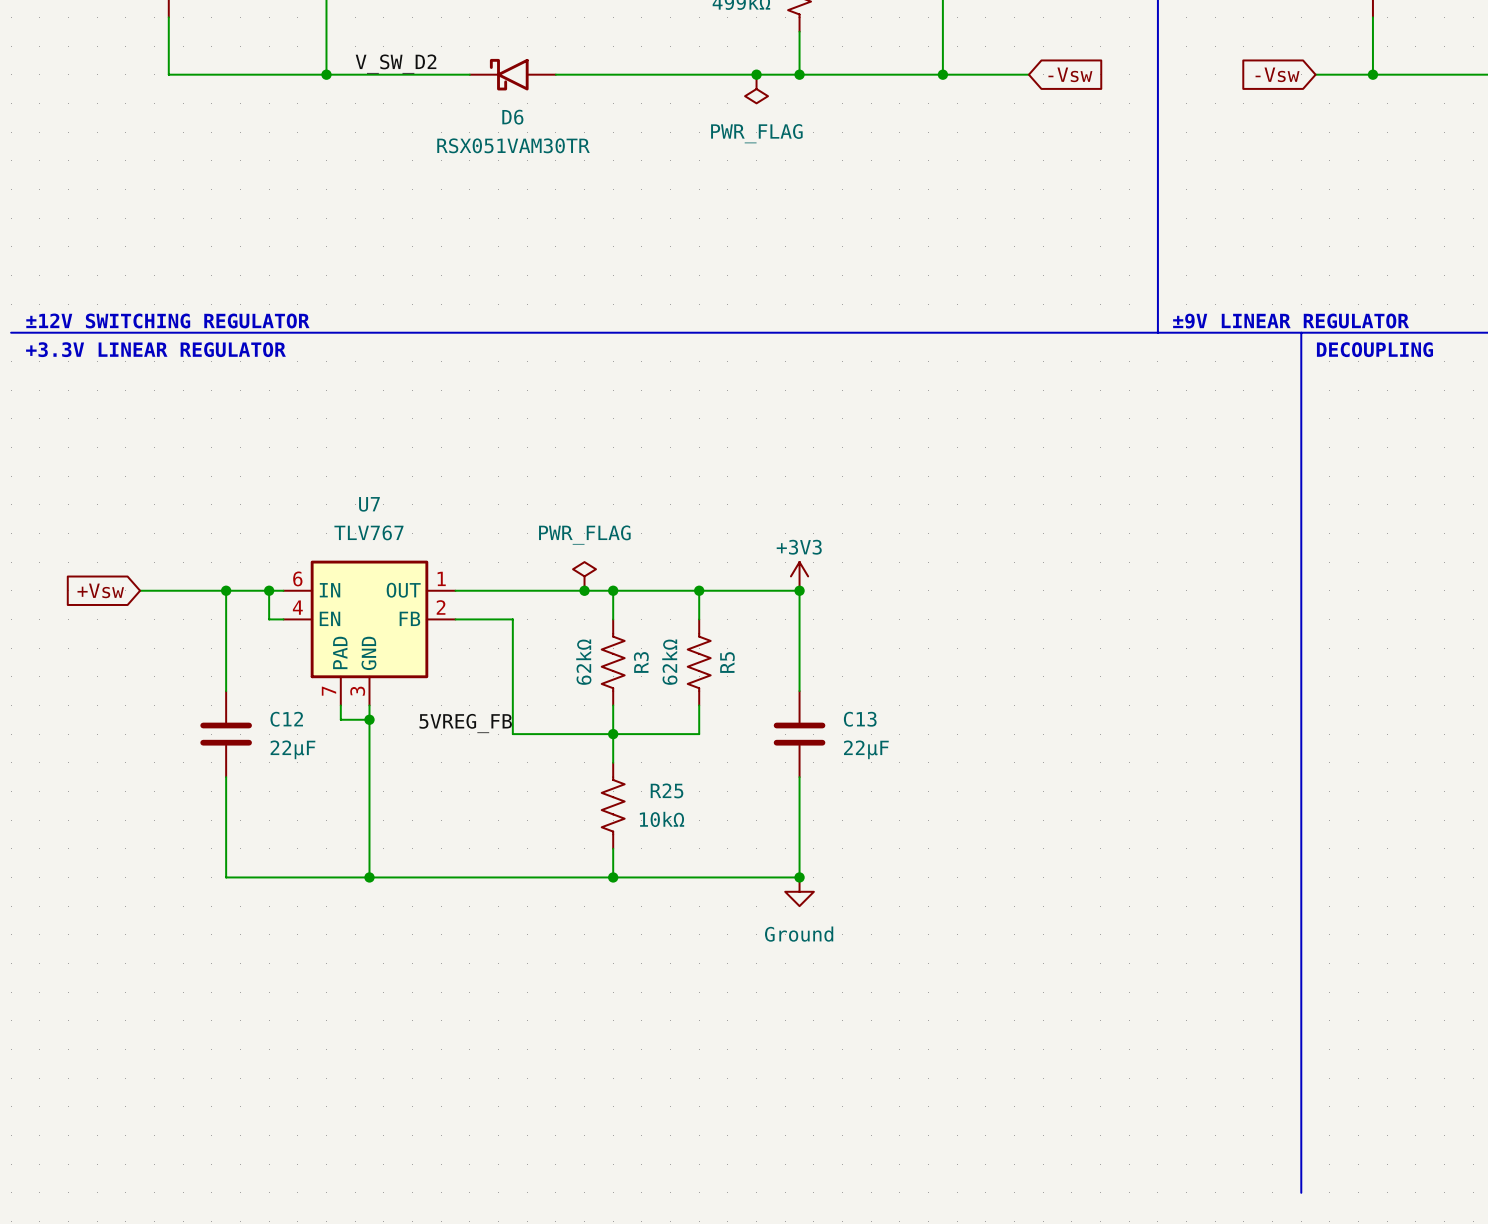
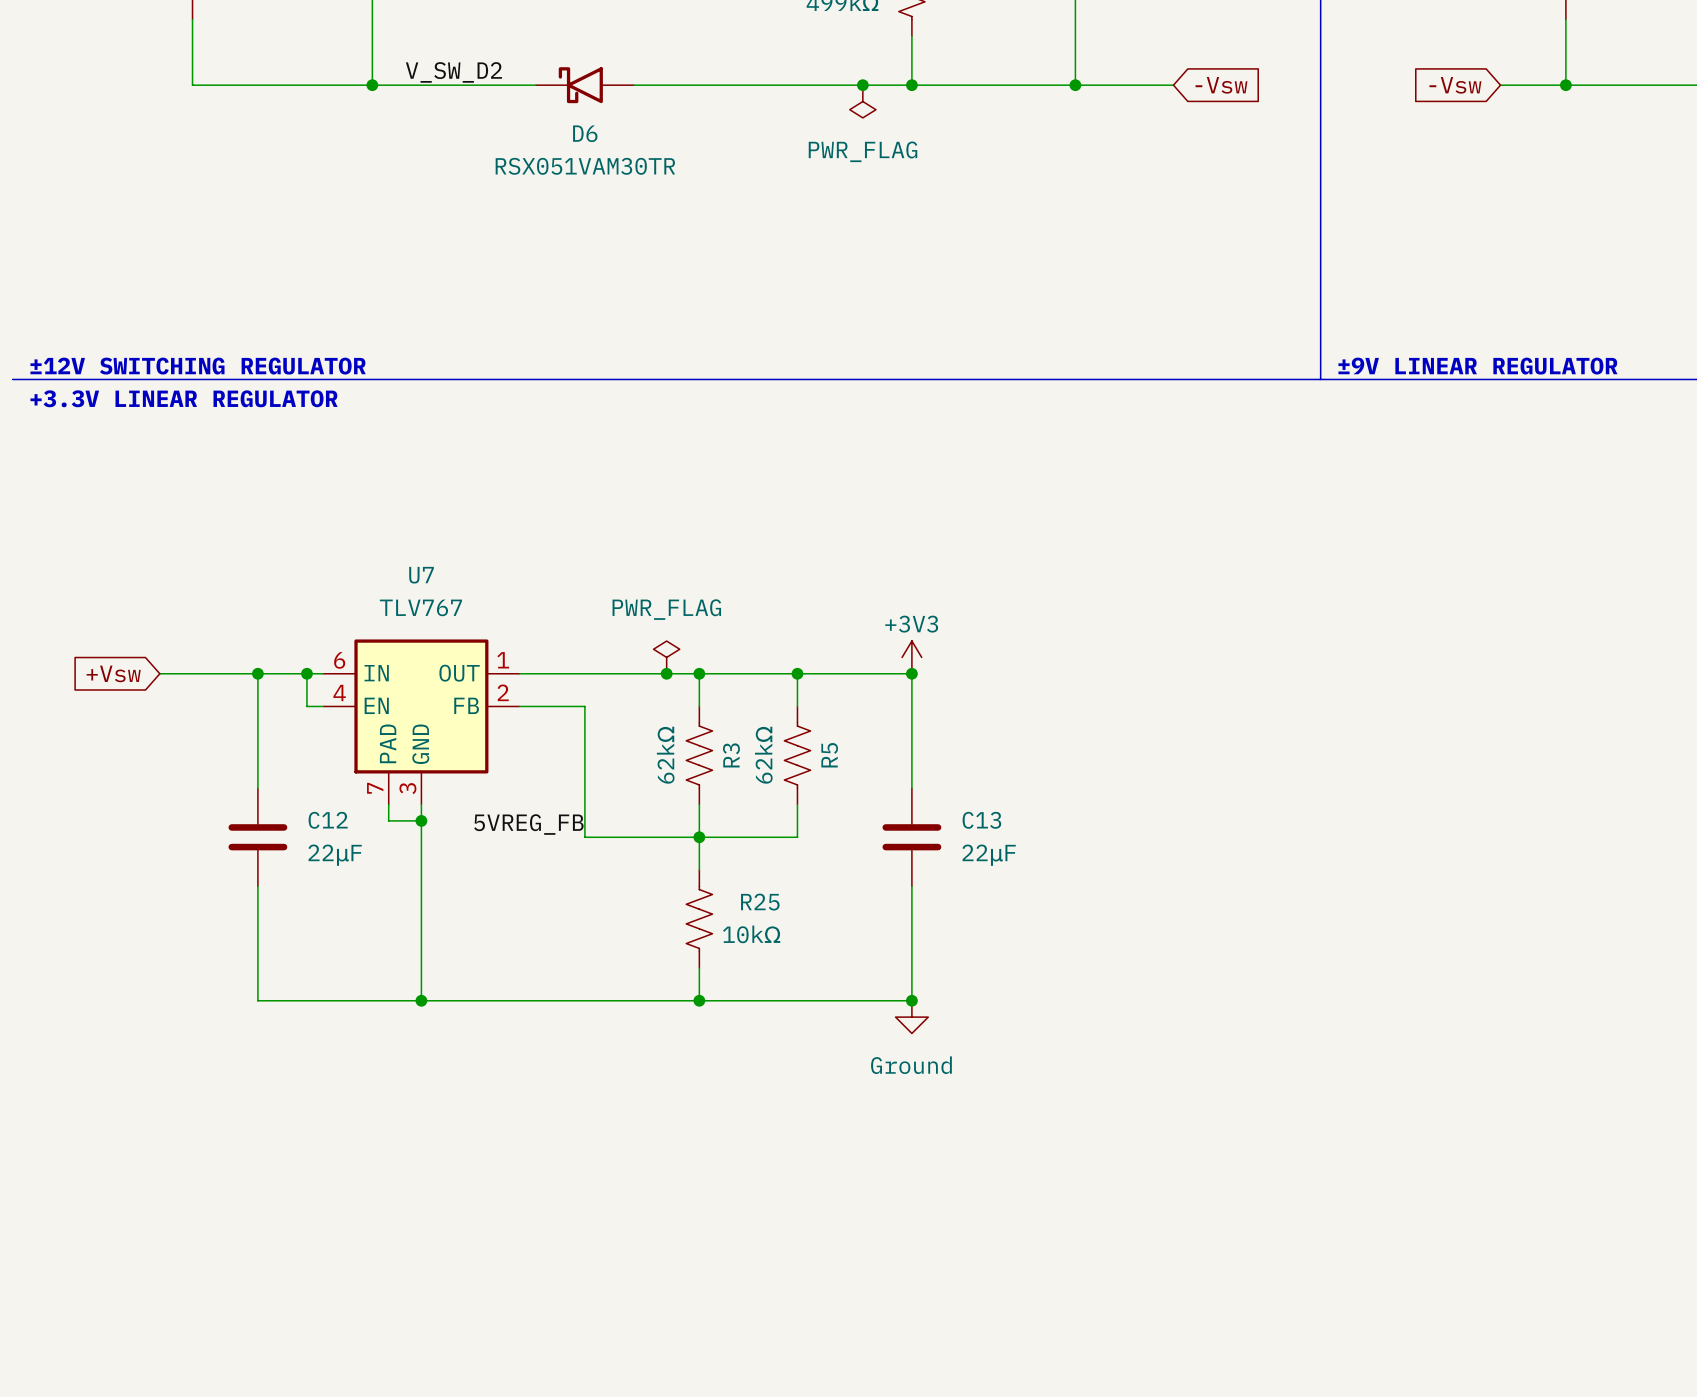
line: (1301, 332) (1301, 1192) -> none
text: DECOUPLING (1374, 349) -> none

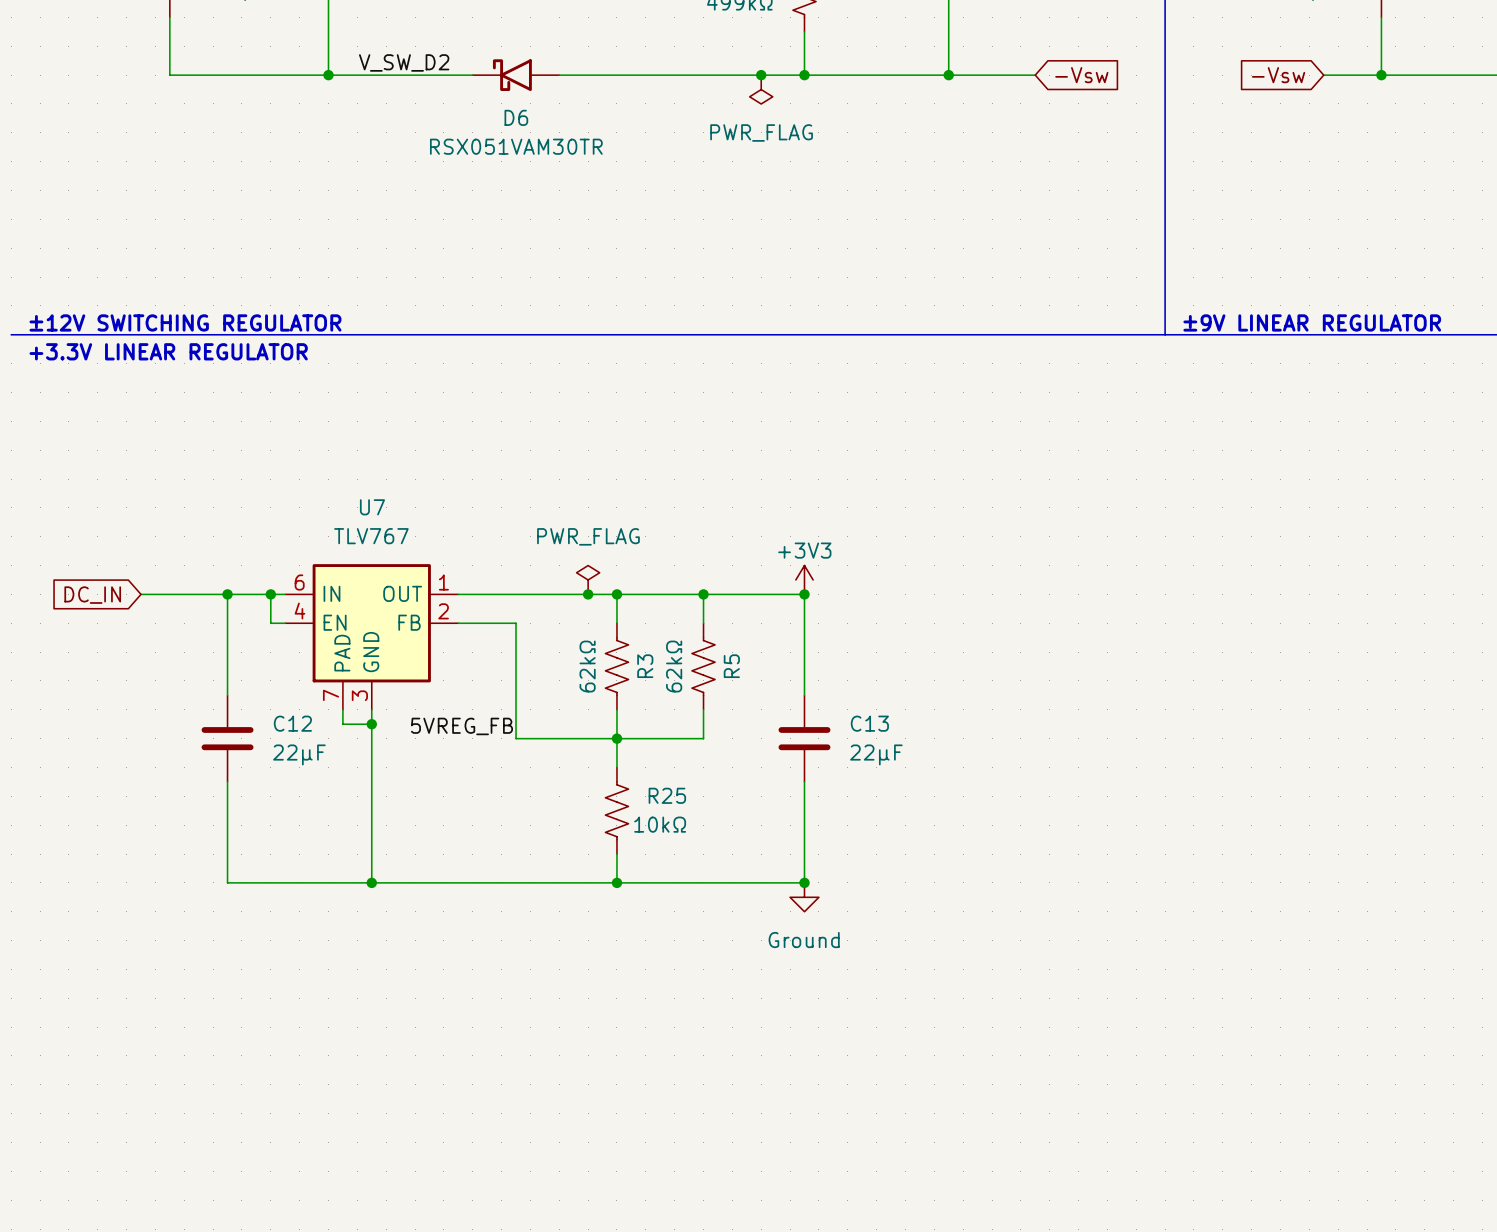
global label: +Vsw (113, 673) -> DC_IN (92, 595)

